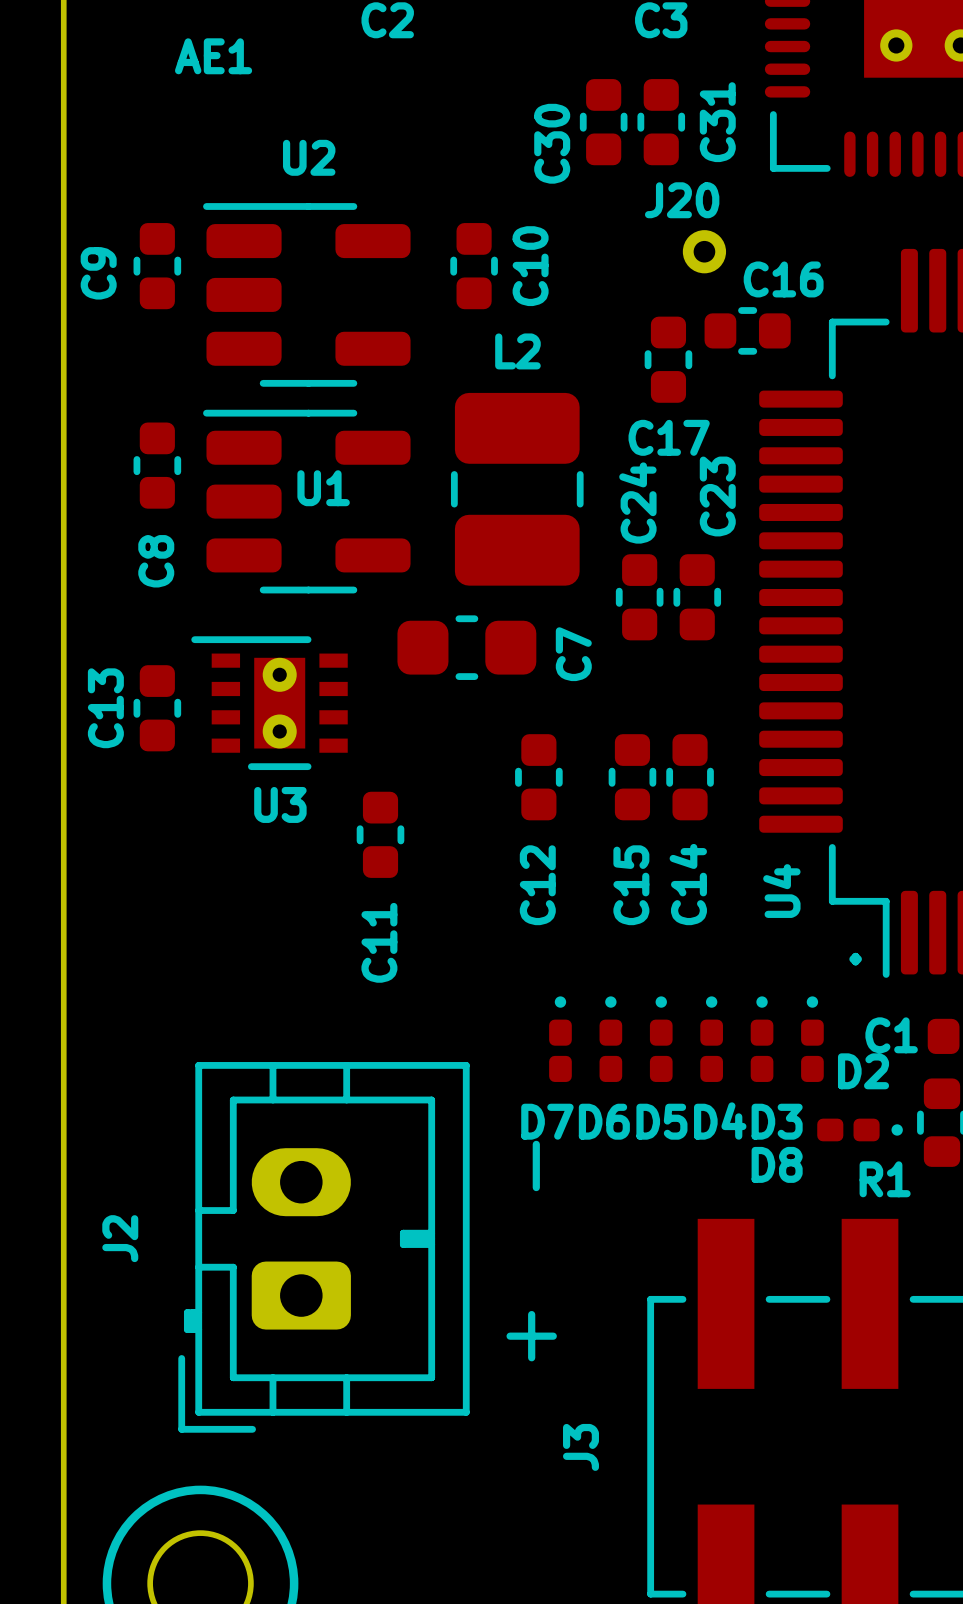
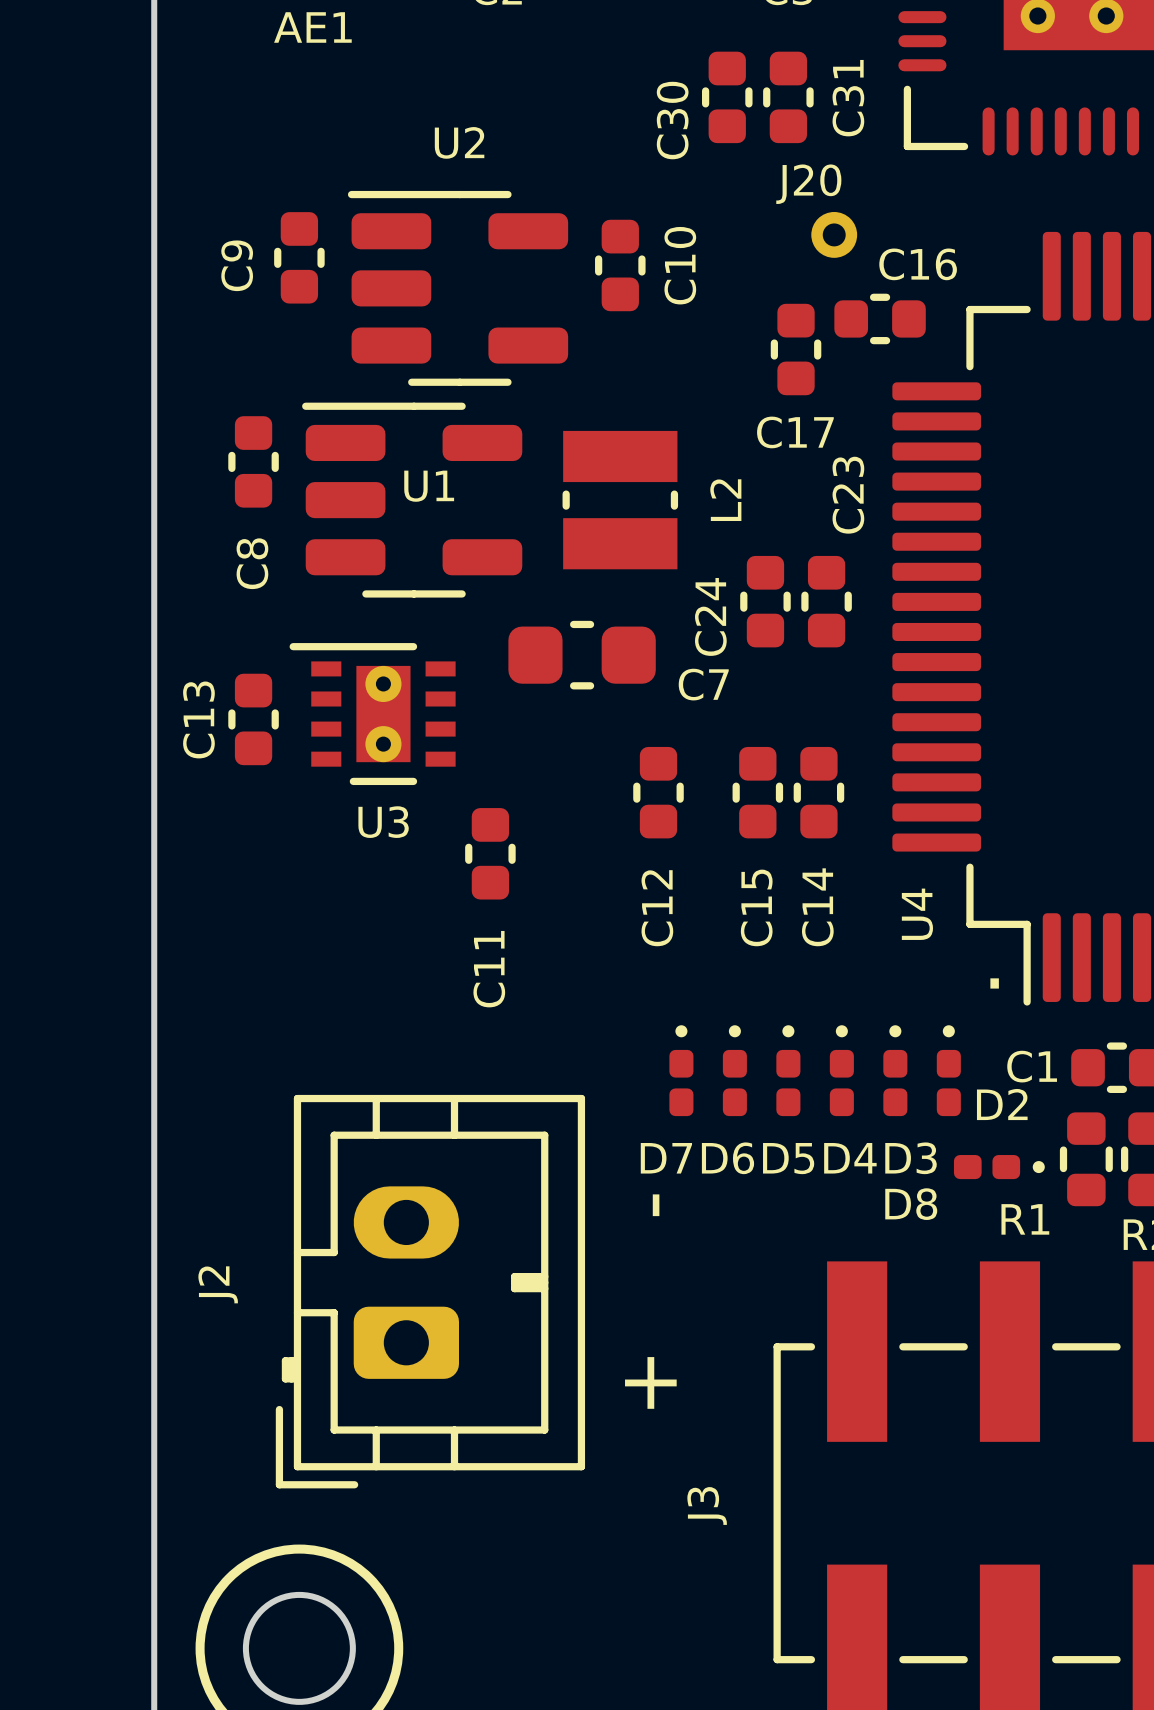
C9 position: (157, 266) -> (299, 257)
C10 position: (474, 266) -> (620, 265)
U2 position: (306, 294) -> (458, 288)
L2 name rotation: 0° (517, 351) -> 90° counterclockwise (725, 500)
L2 name position: L2 (517, 351) -> L2 (725, 500)
L2 footprint: [450, 392, 584, 586] -> [562, 430, 679, 570]
C24 name position: C24 (637, 503) -> C24 (710, 616)
C7 name rotation: 0° (573, 654) -> 90° clockwise (703, 684)

